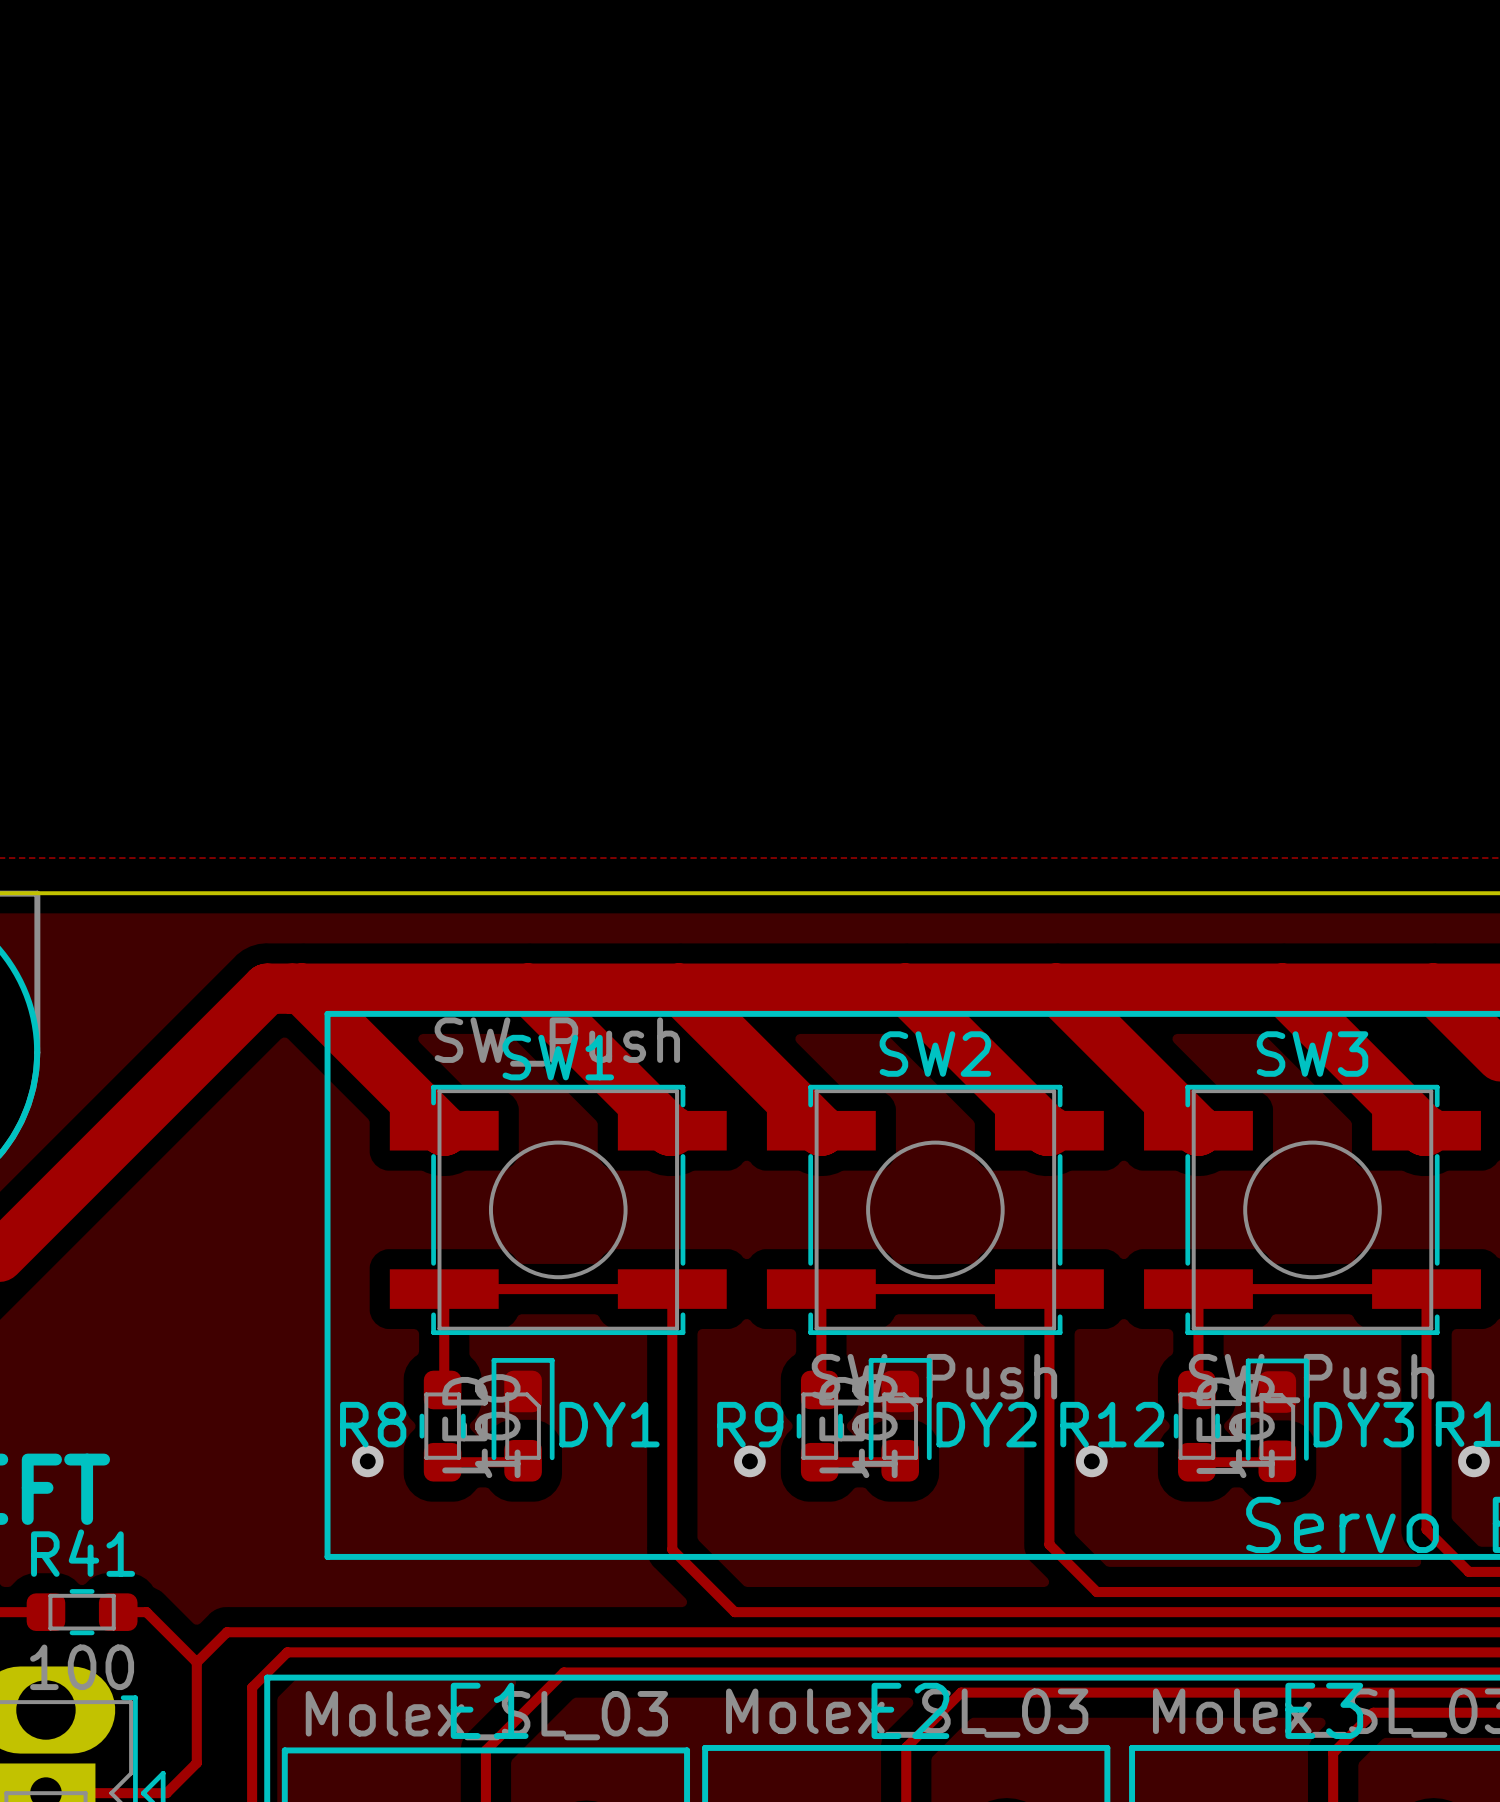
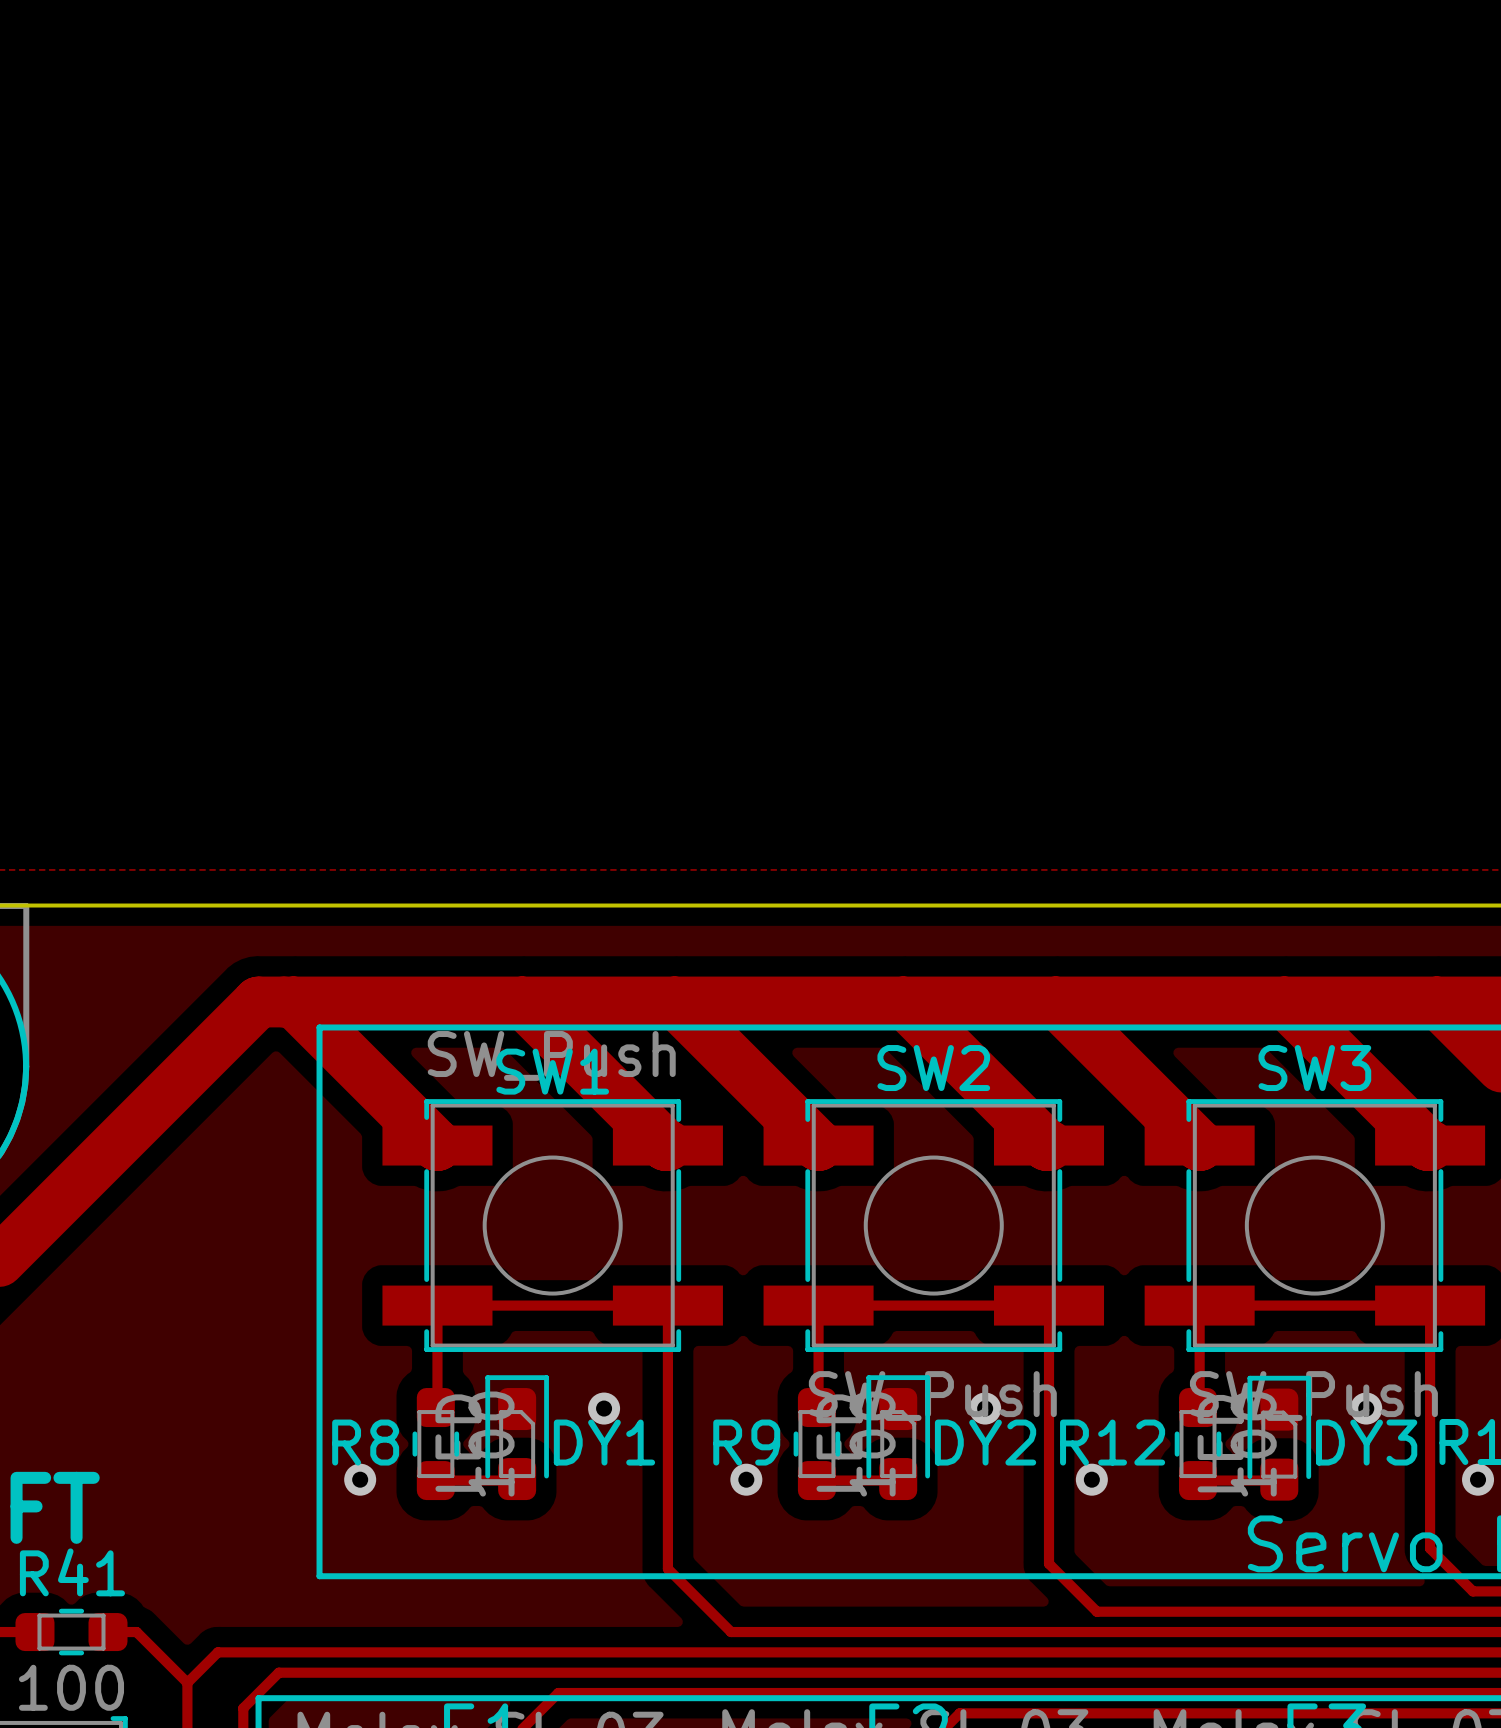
via: none -> (604, 1408)
via: none -> (985, 1408)
via: none -> (1366, 1408)

